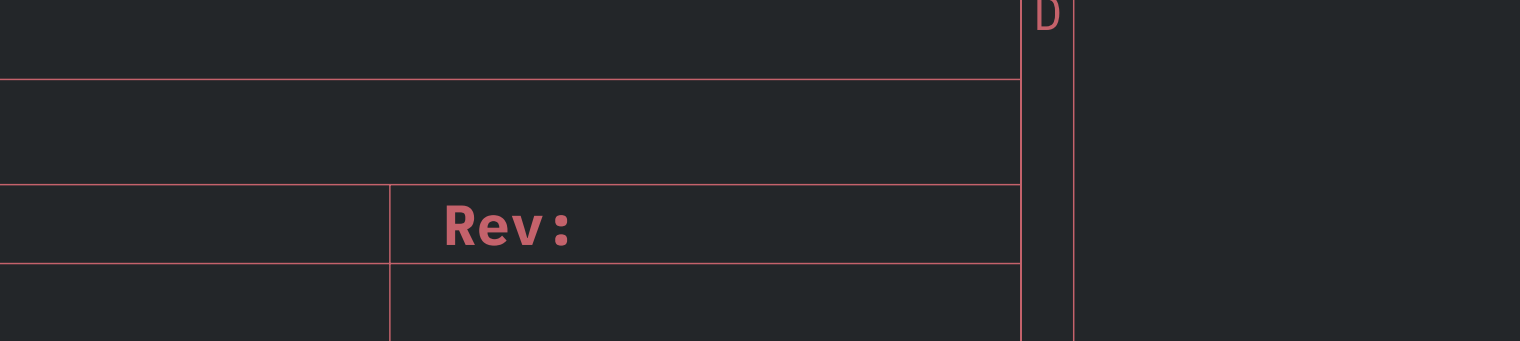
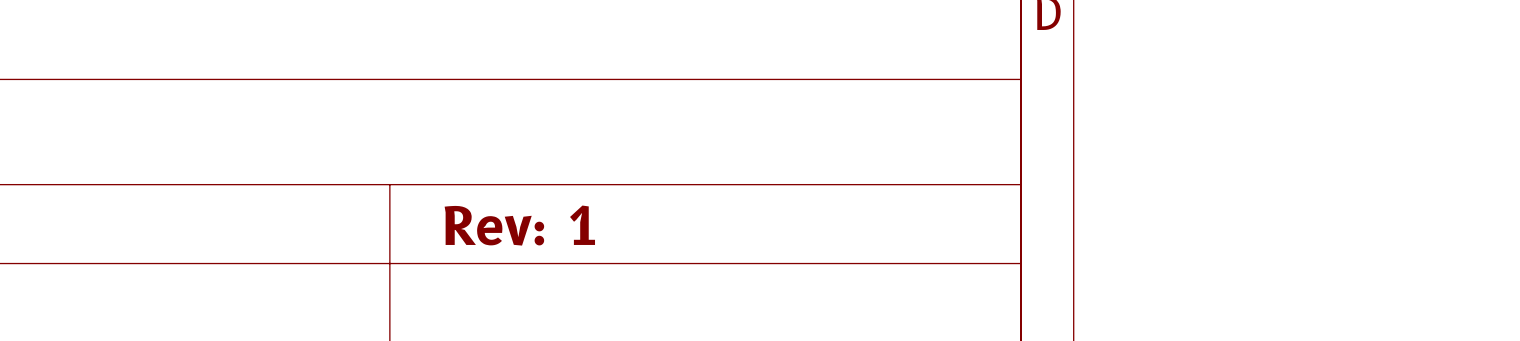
title block: Rev: (506, 225) -> Rev: 1 (519, 225)

